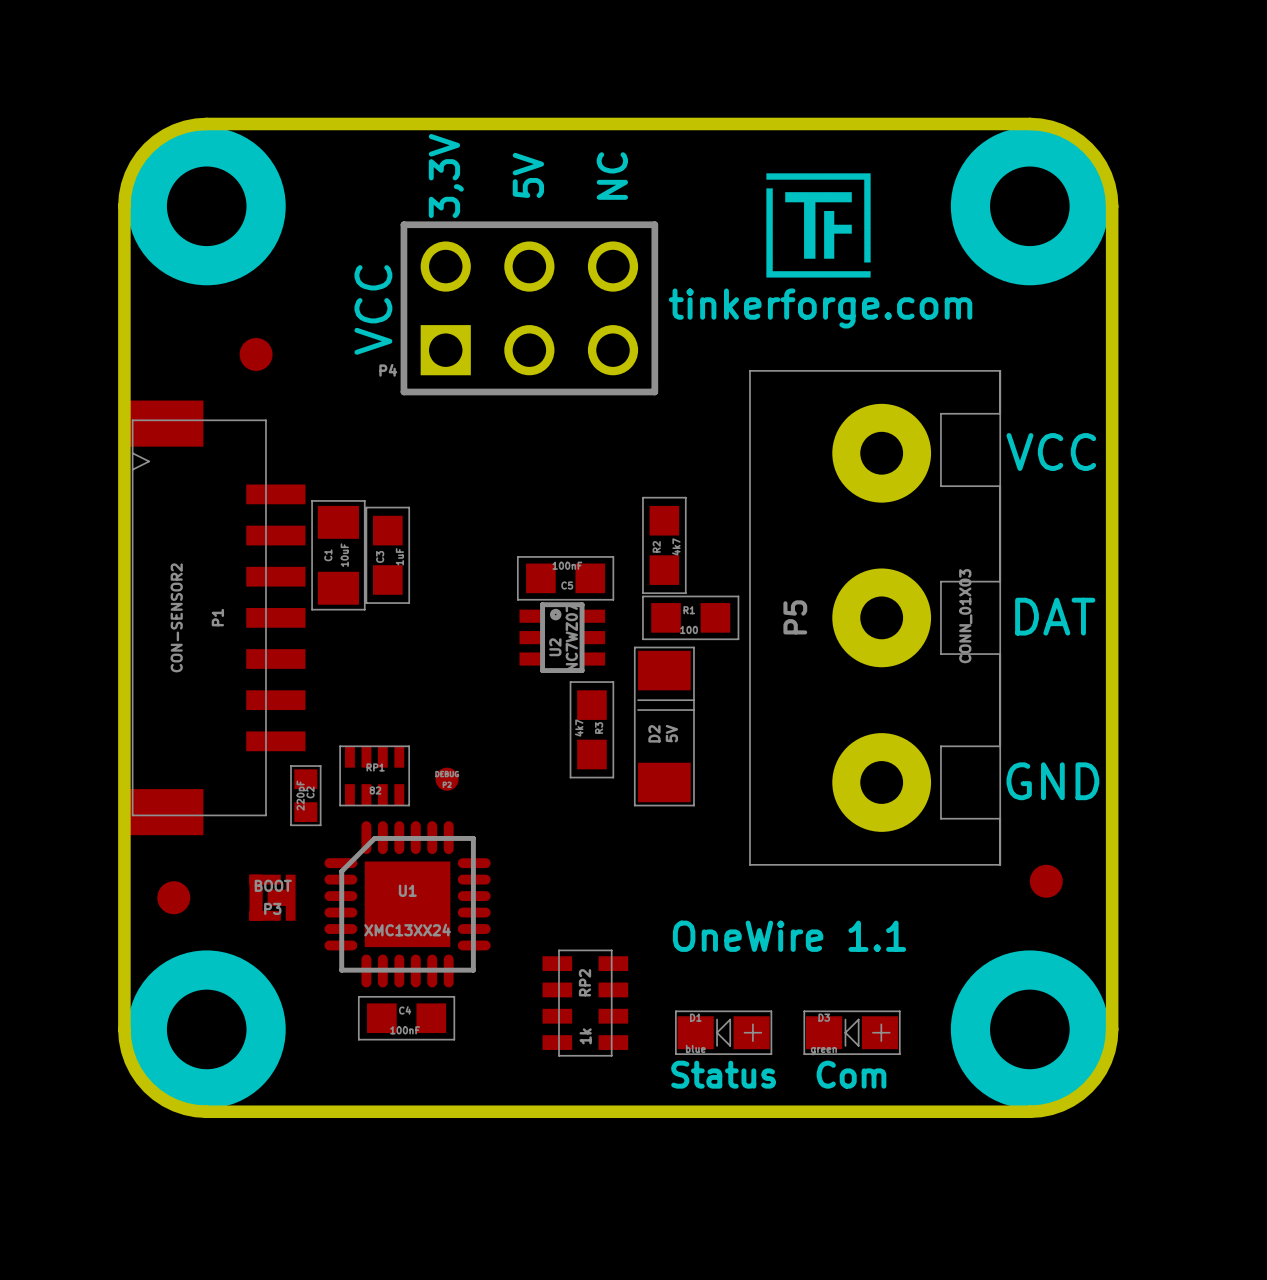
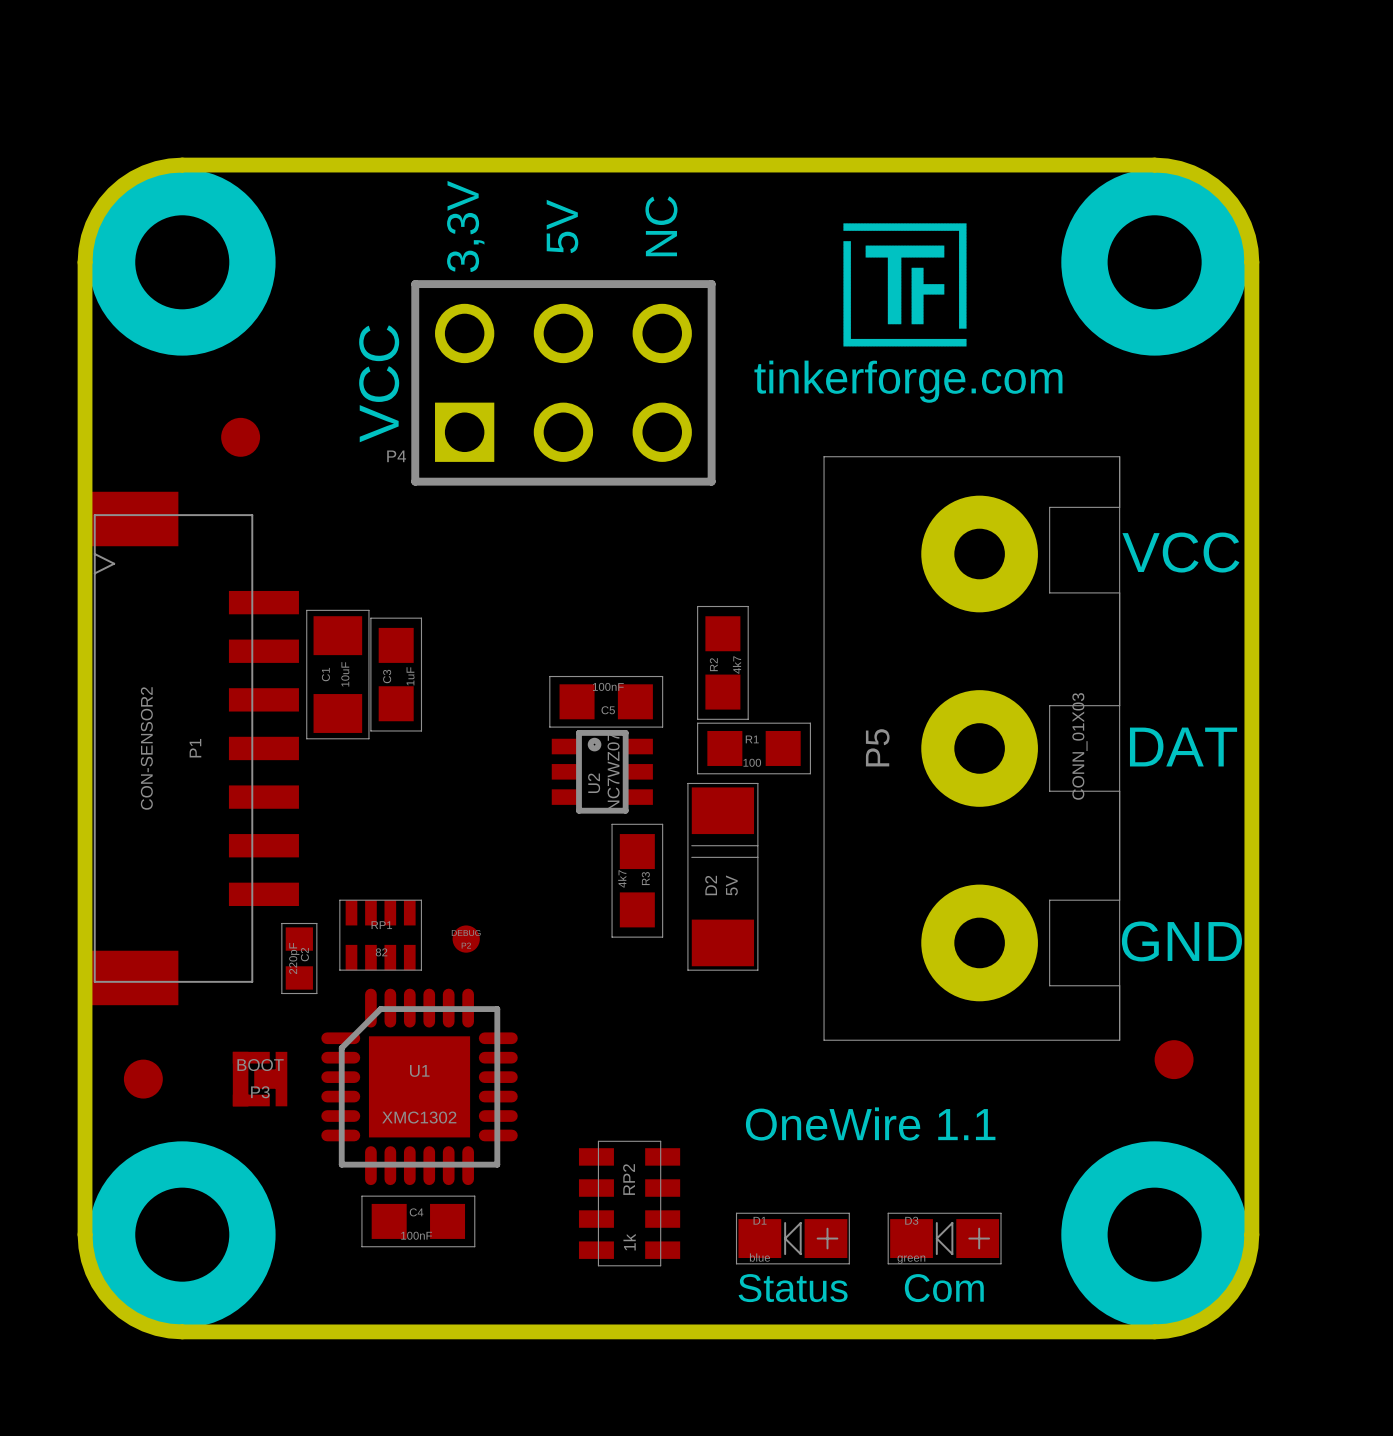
U1 value: XMC13XX24 (407, 930) -> XMC1302 (419, 1117)

